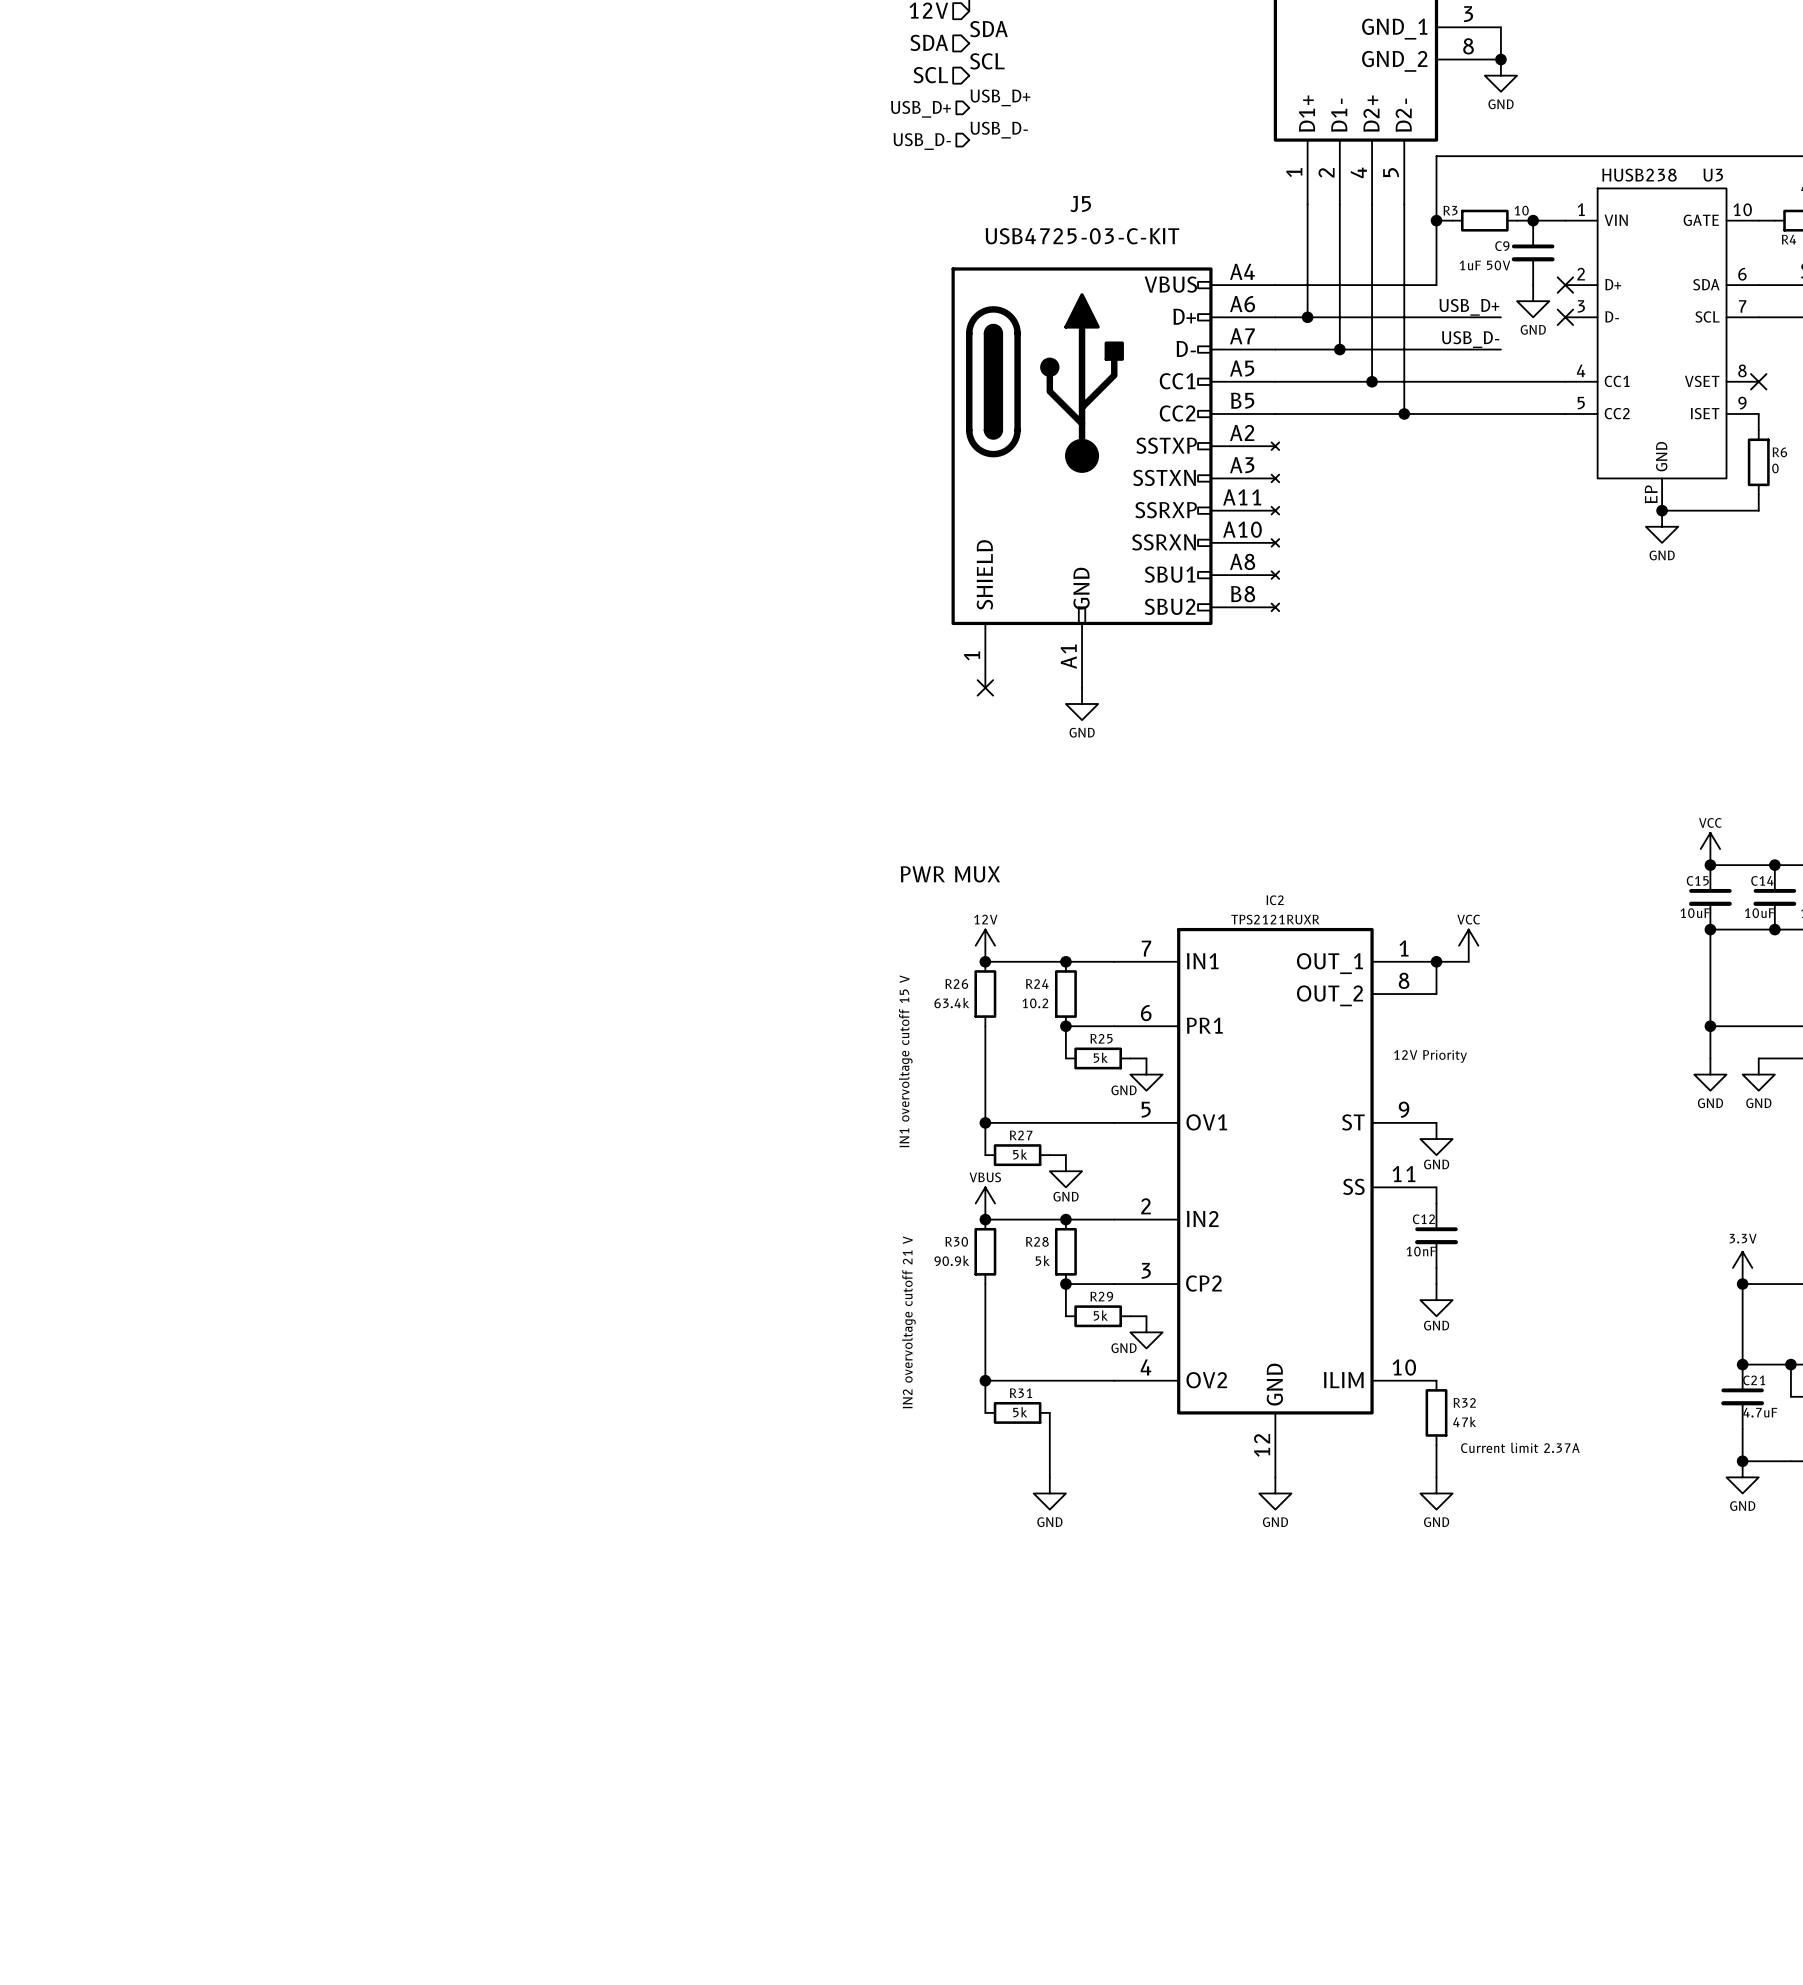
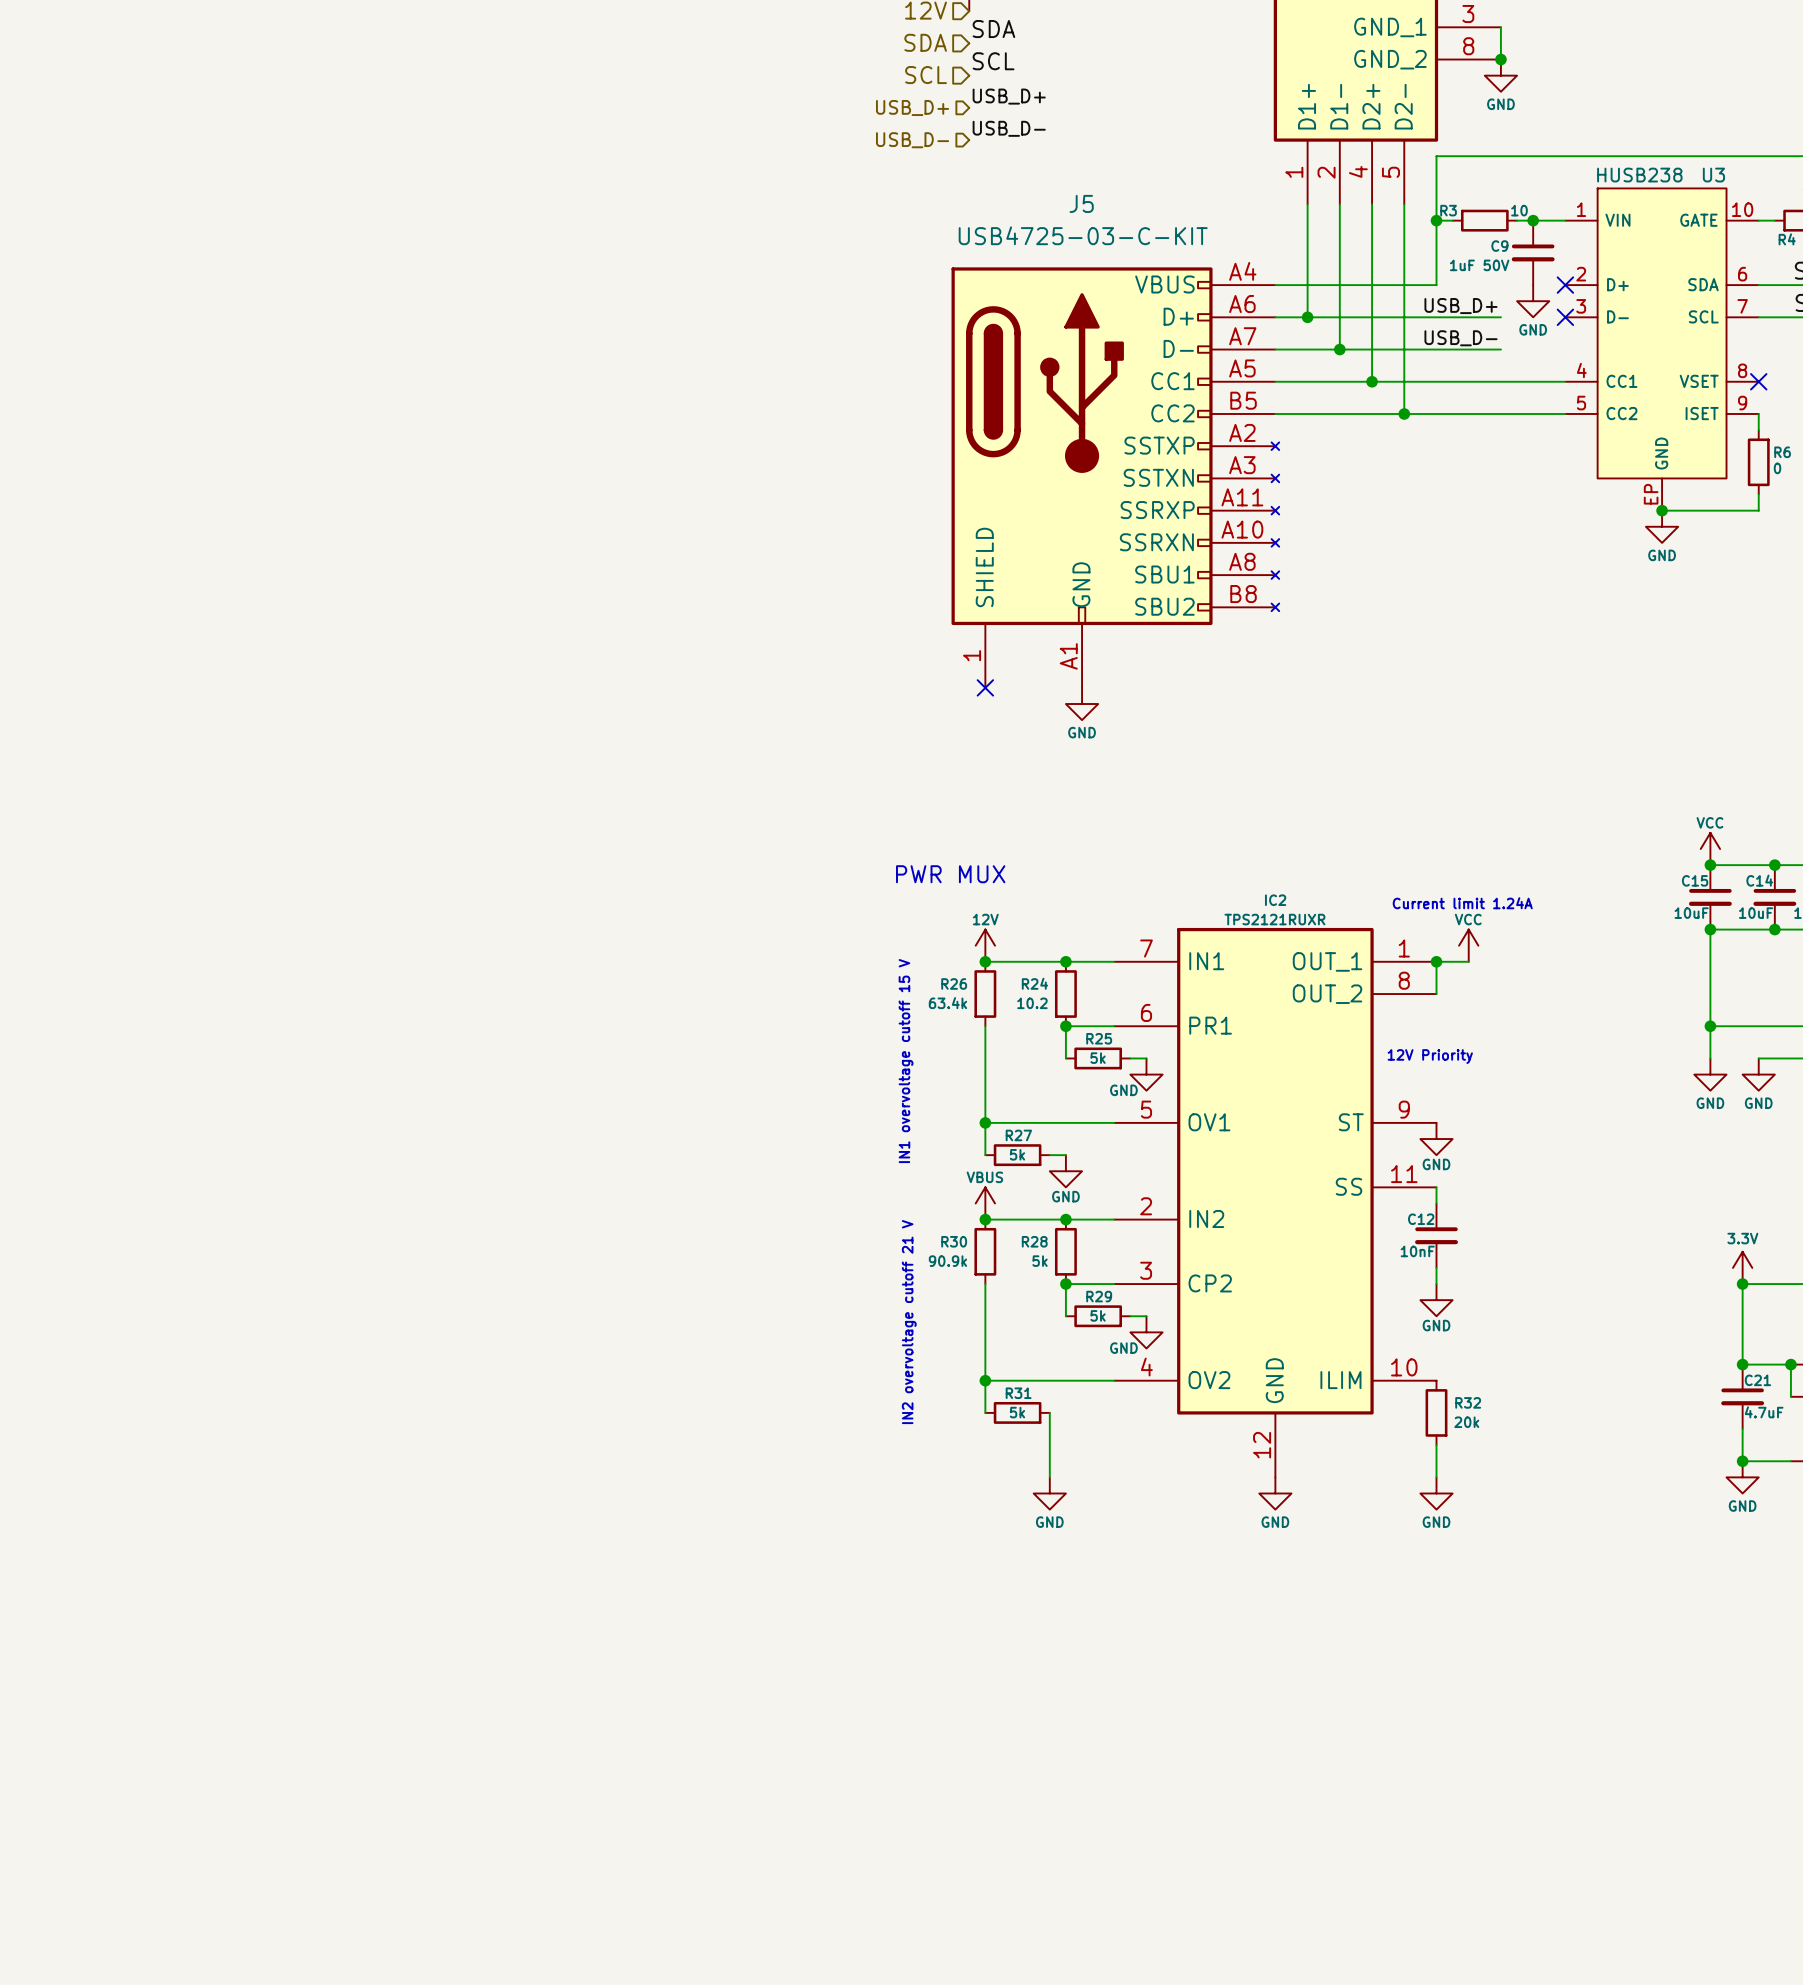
text: none -> Current limit 1.24A (1462, 903)
R32 value: 47k (1464, 1421) -> 20k (1466, 1422)
text: Current limit 2.37A (1520, 1447) -> none

